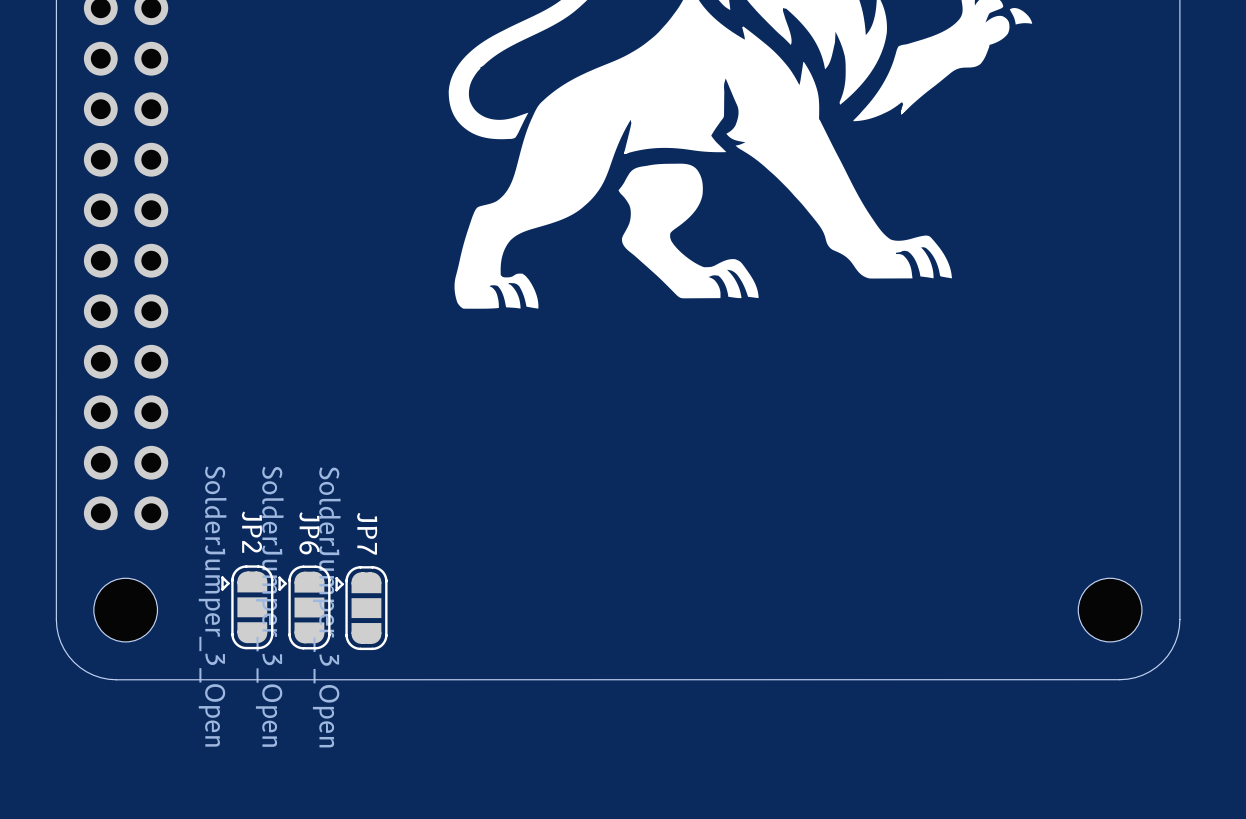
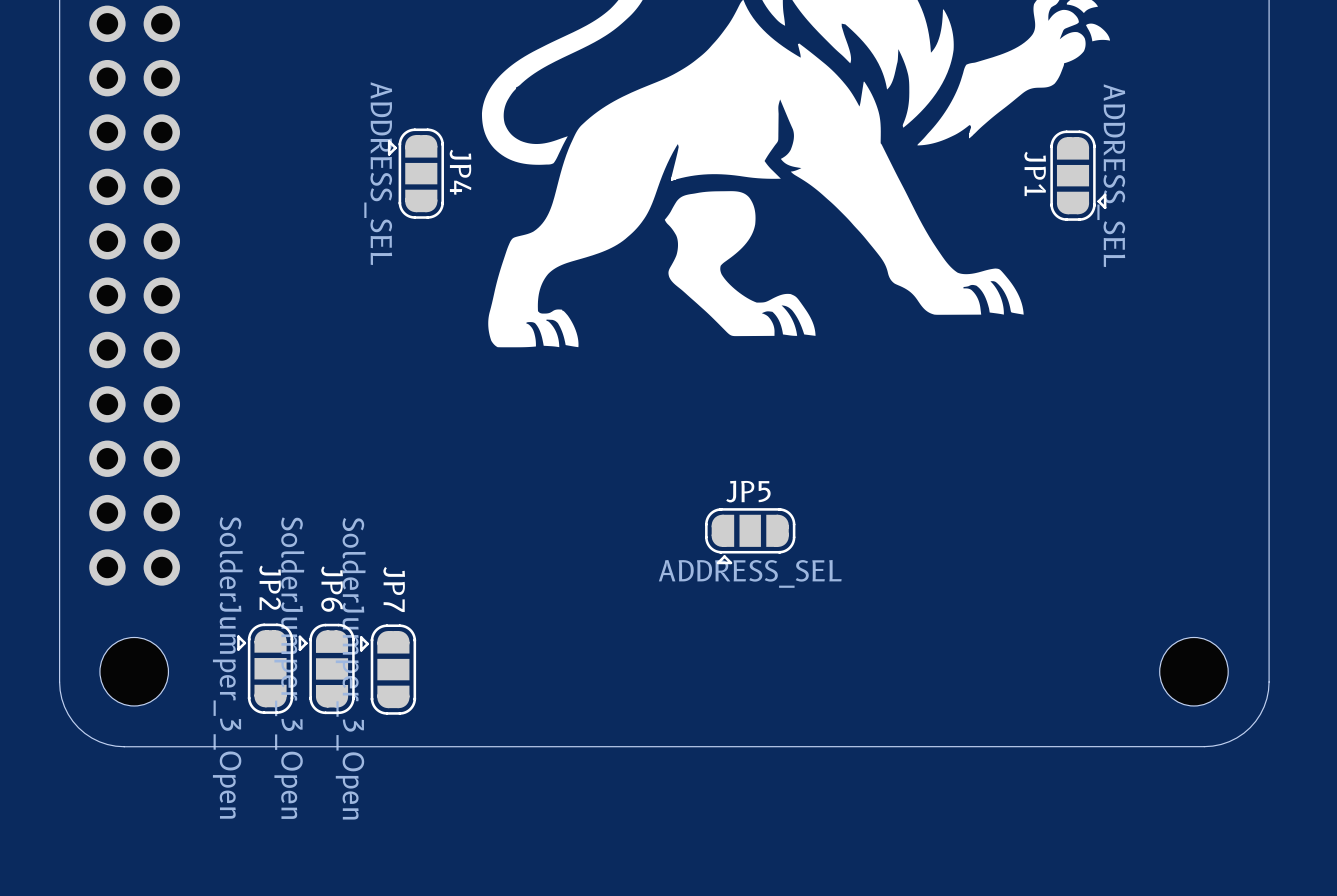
JP4: none -> ADDRESS_SEL (415, 173)
JP1: none -> ADDRESS_SEL (1078, 175)
JP5: none -> ADDRESS_SEL (750, 536)

